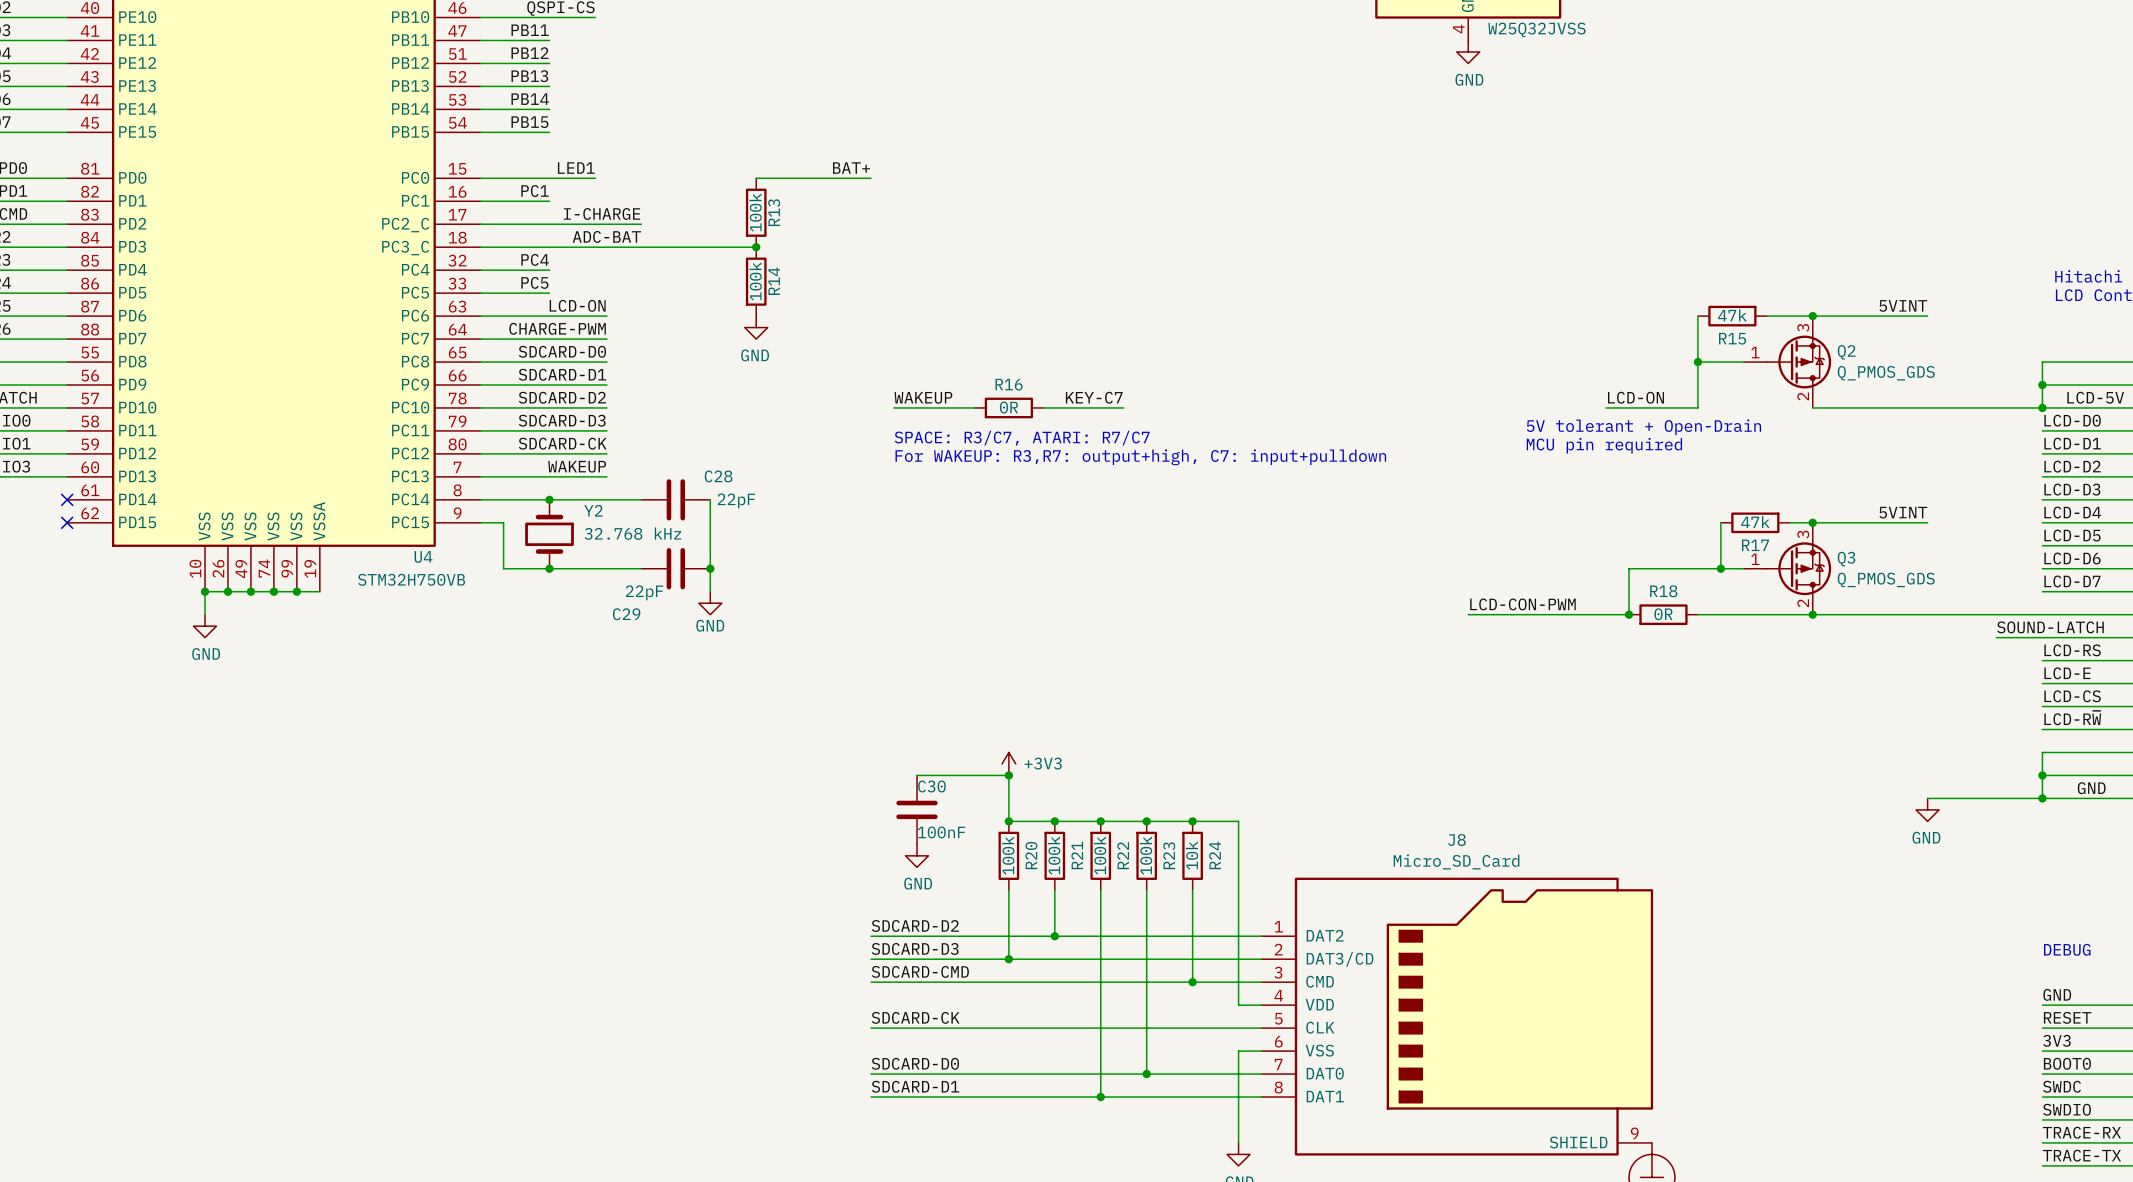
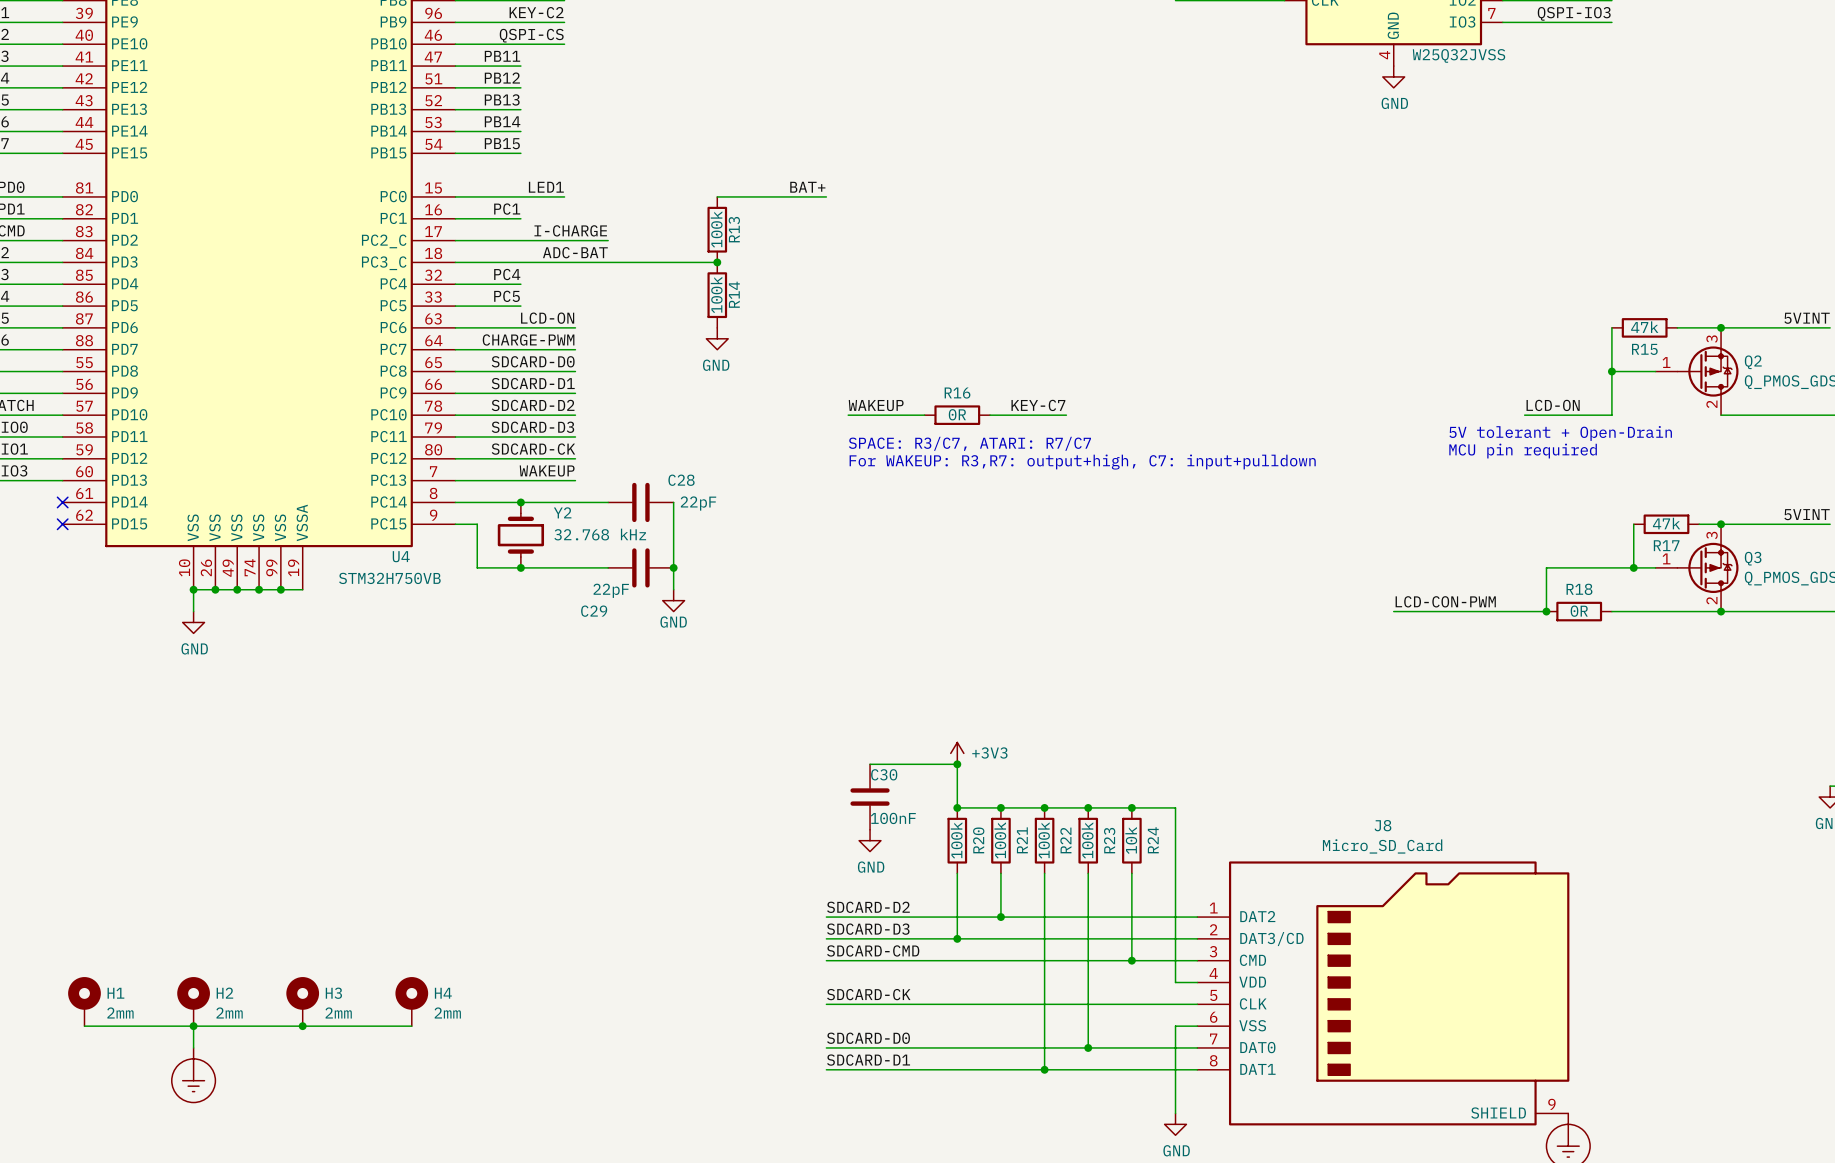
H1: none -> 2mm (84, 1001)
H2: none -> 2mm (193, 1001)
H3: none -> 2mm (302, 1001)
H4: none -> 2mm (411, 1001)
wire: none -> (84, 1026) (411, 1026)
wire: none -> (193, 1026) (193, 1047)
junction: none -> (193, 1026)
junction: none -> (302, 1026)
power symbol: none -> (193, 1075)

